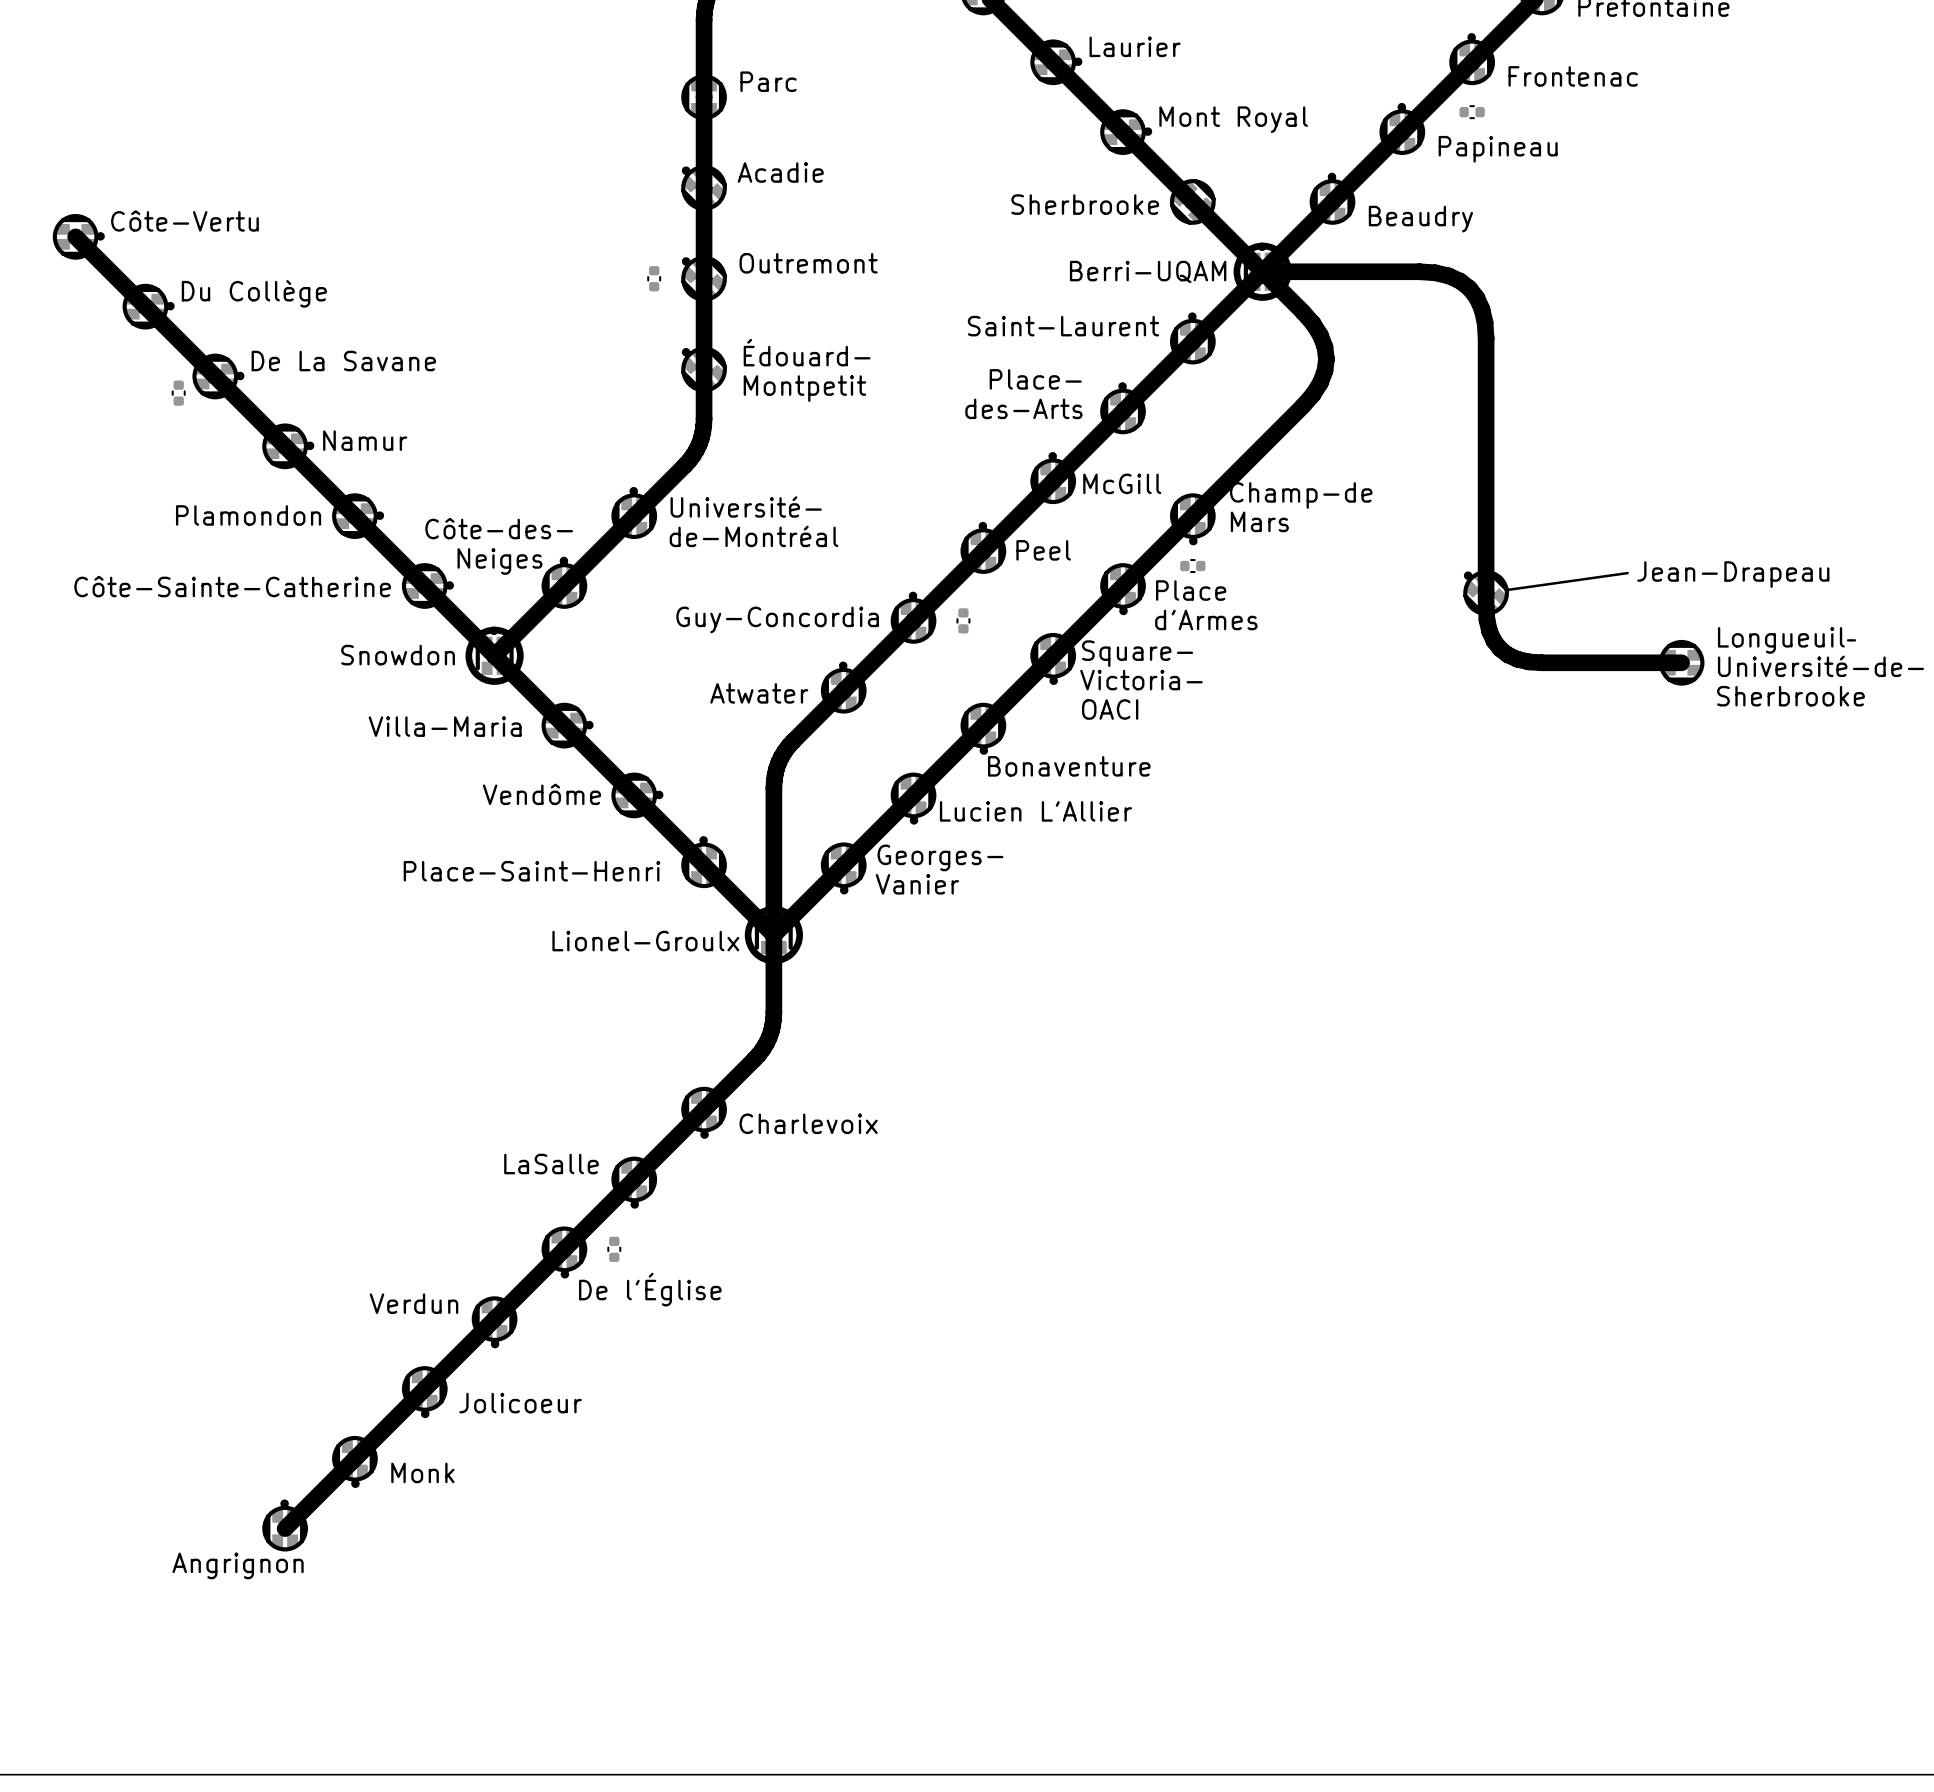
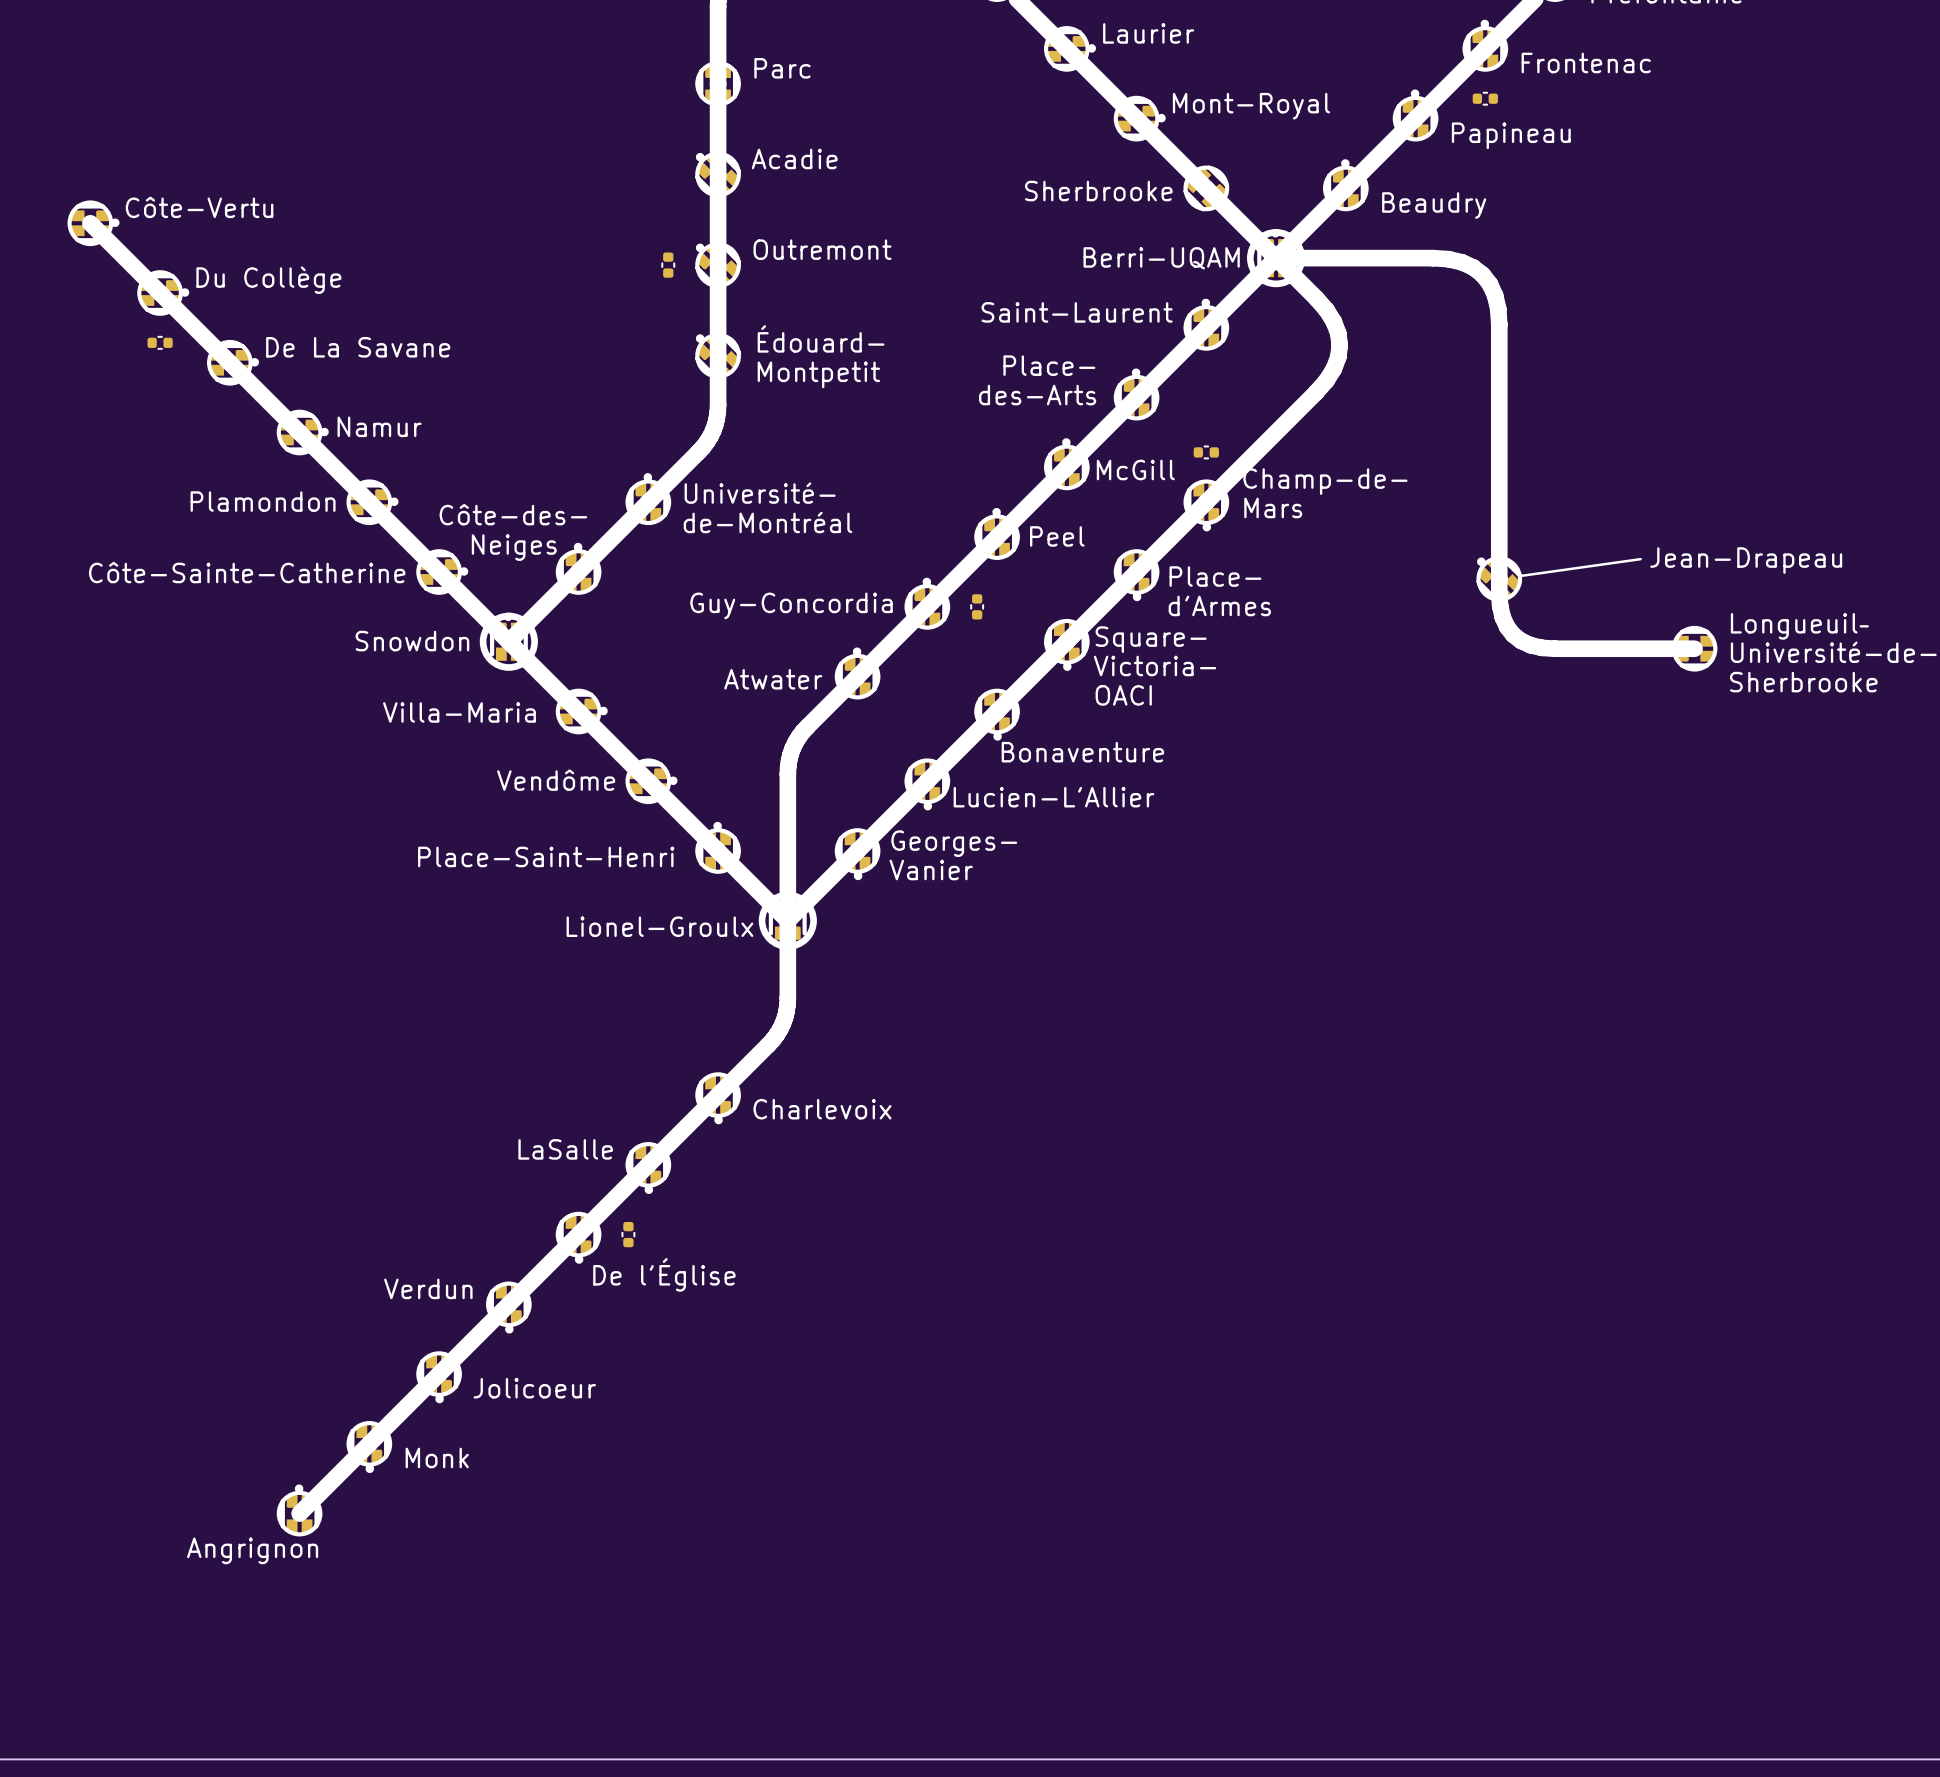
text: Mont Royal (1233, 119) -> Mont-Royal (1251, 106)
part rotation: 0° (178, 393) -> 90° clockwise (160, 342)
part position: (178, 393) -> (160, 342)
text: Champ-de (1301, 495) -> Champ-de- (1325, 481)
part position: (1192, 566) -> (1206, 452)
text: Place (1191, 590) -> Place- (1215, 576)
text: Lucien L'Allier (1035, 811) -> Lucien-L'Allier (1053, 797)

